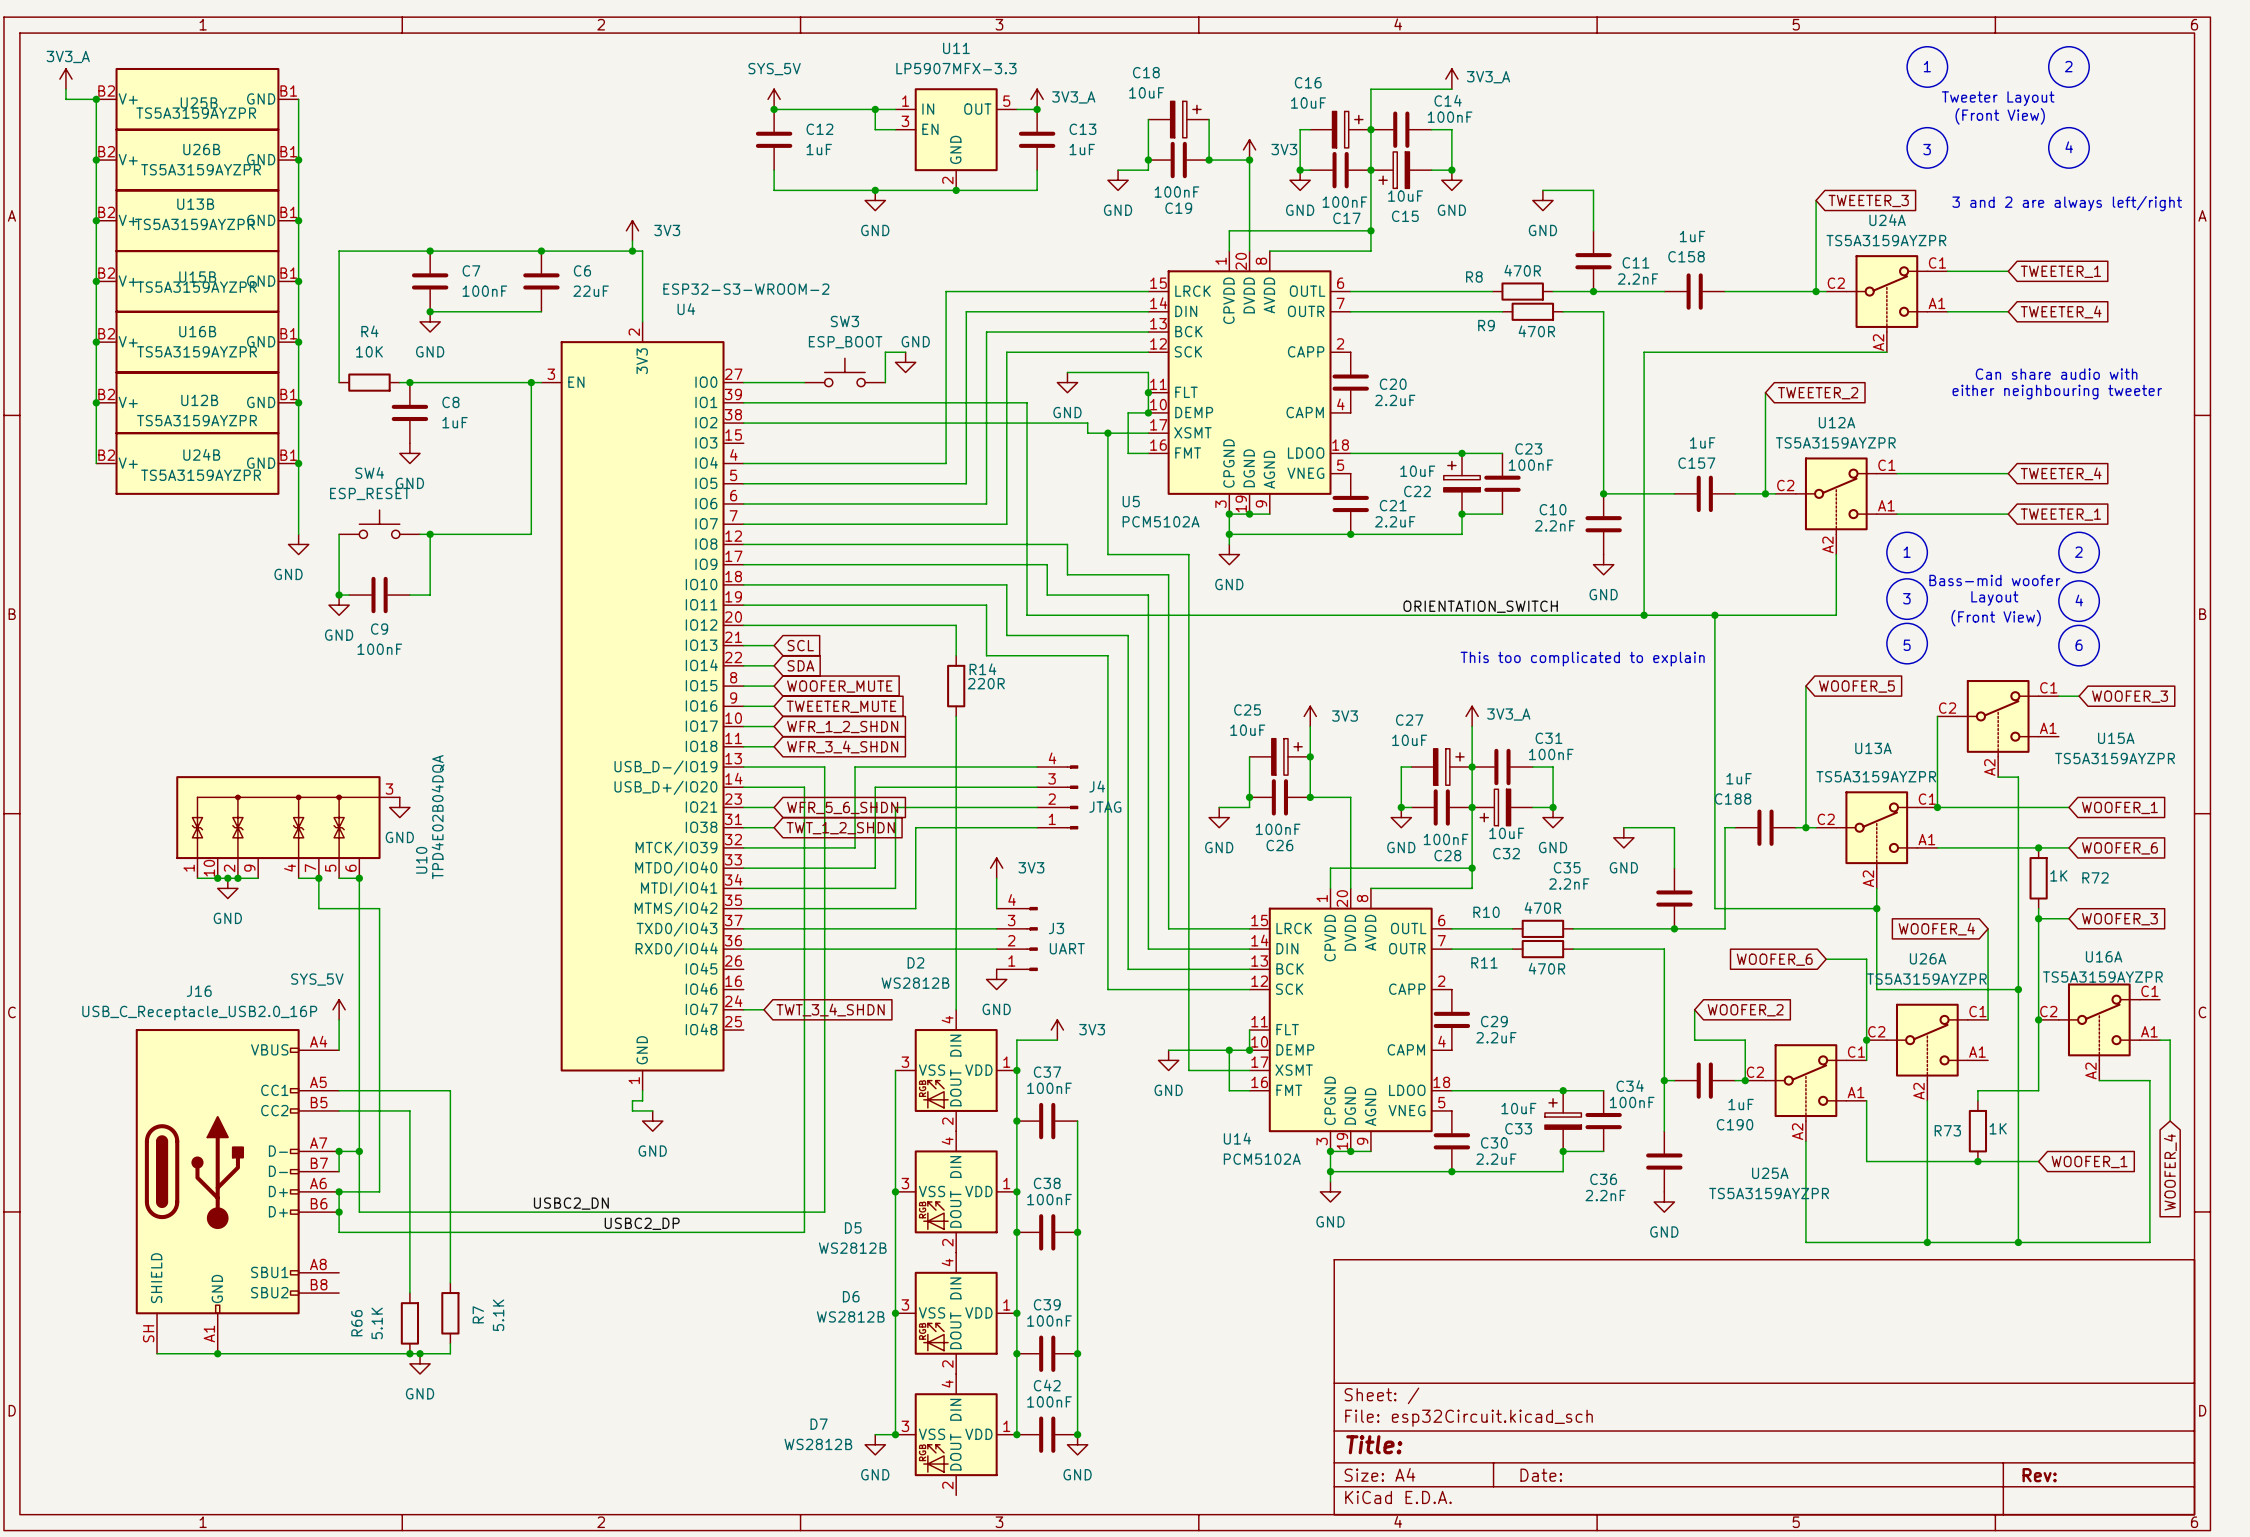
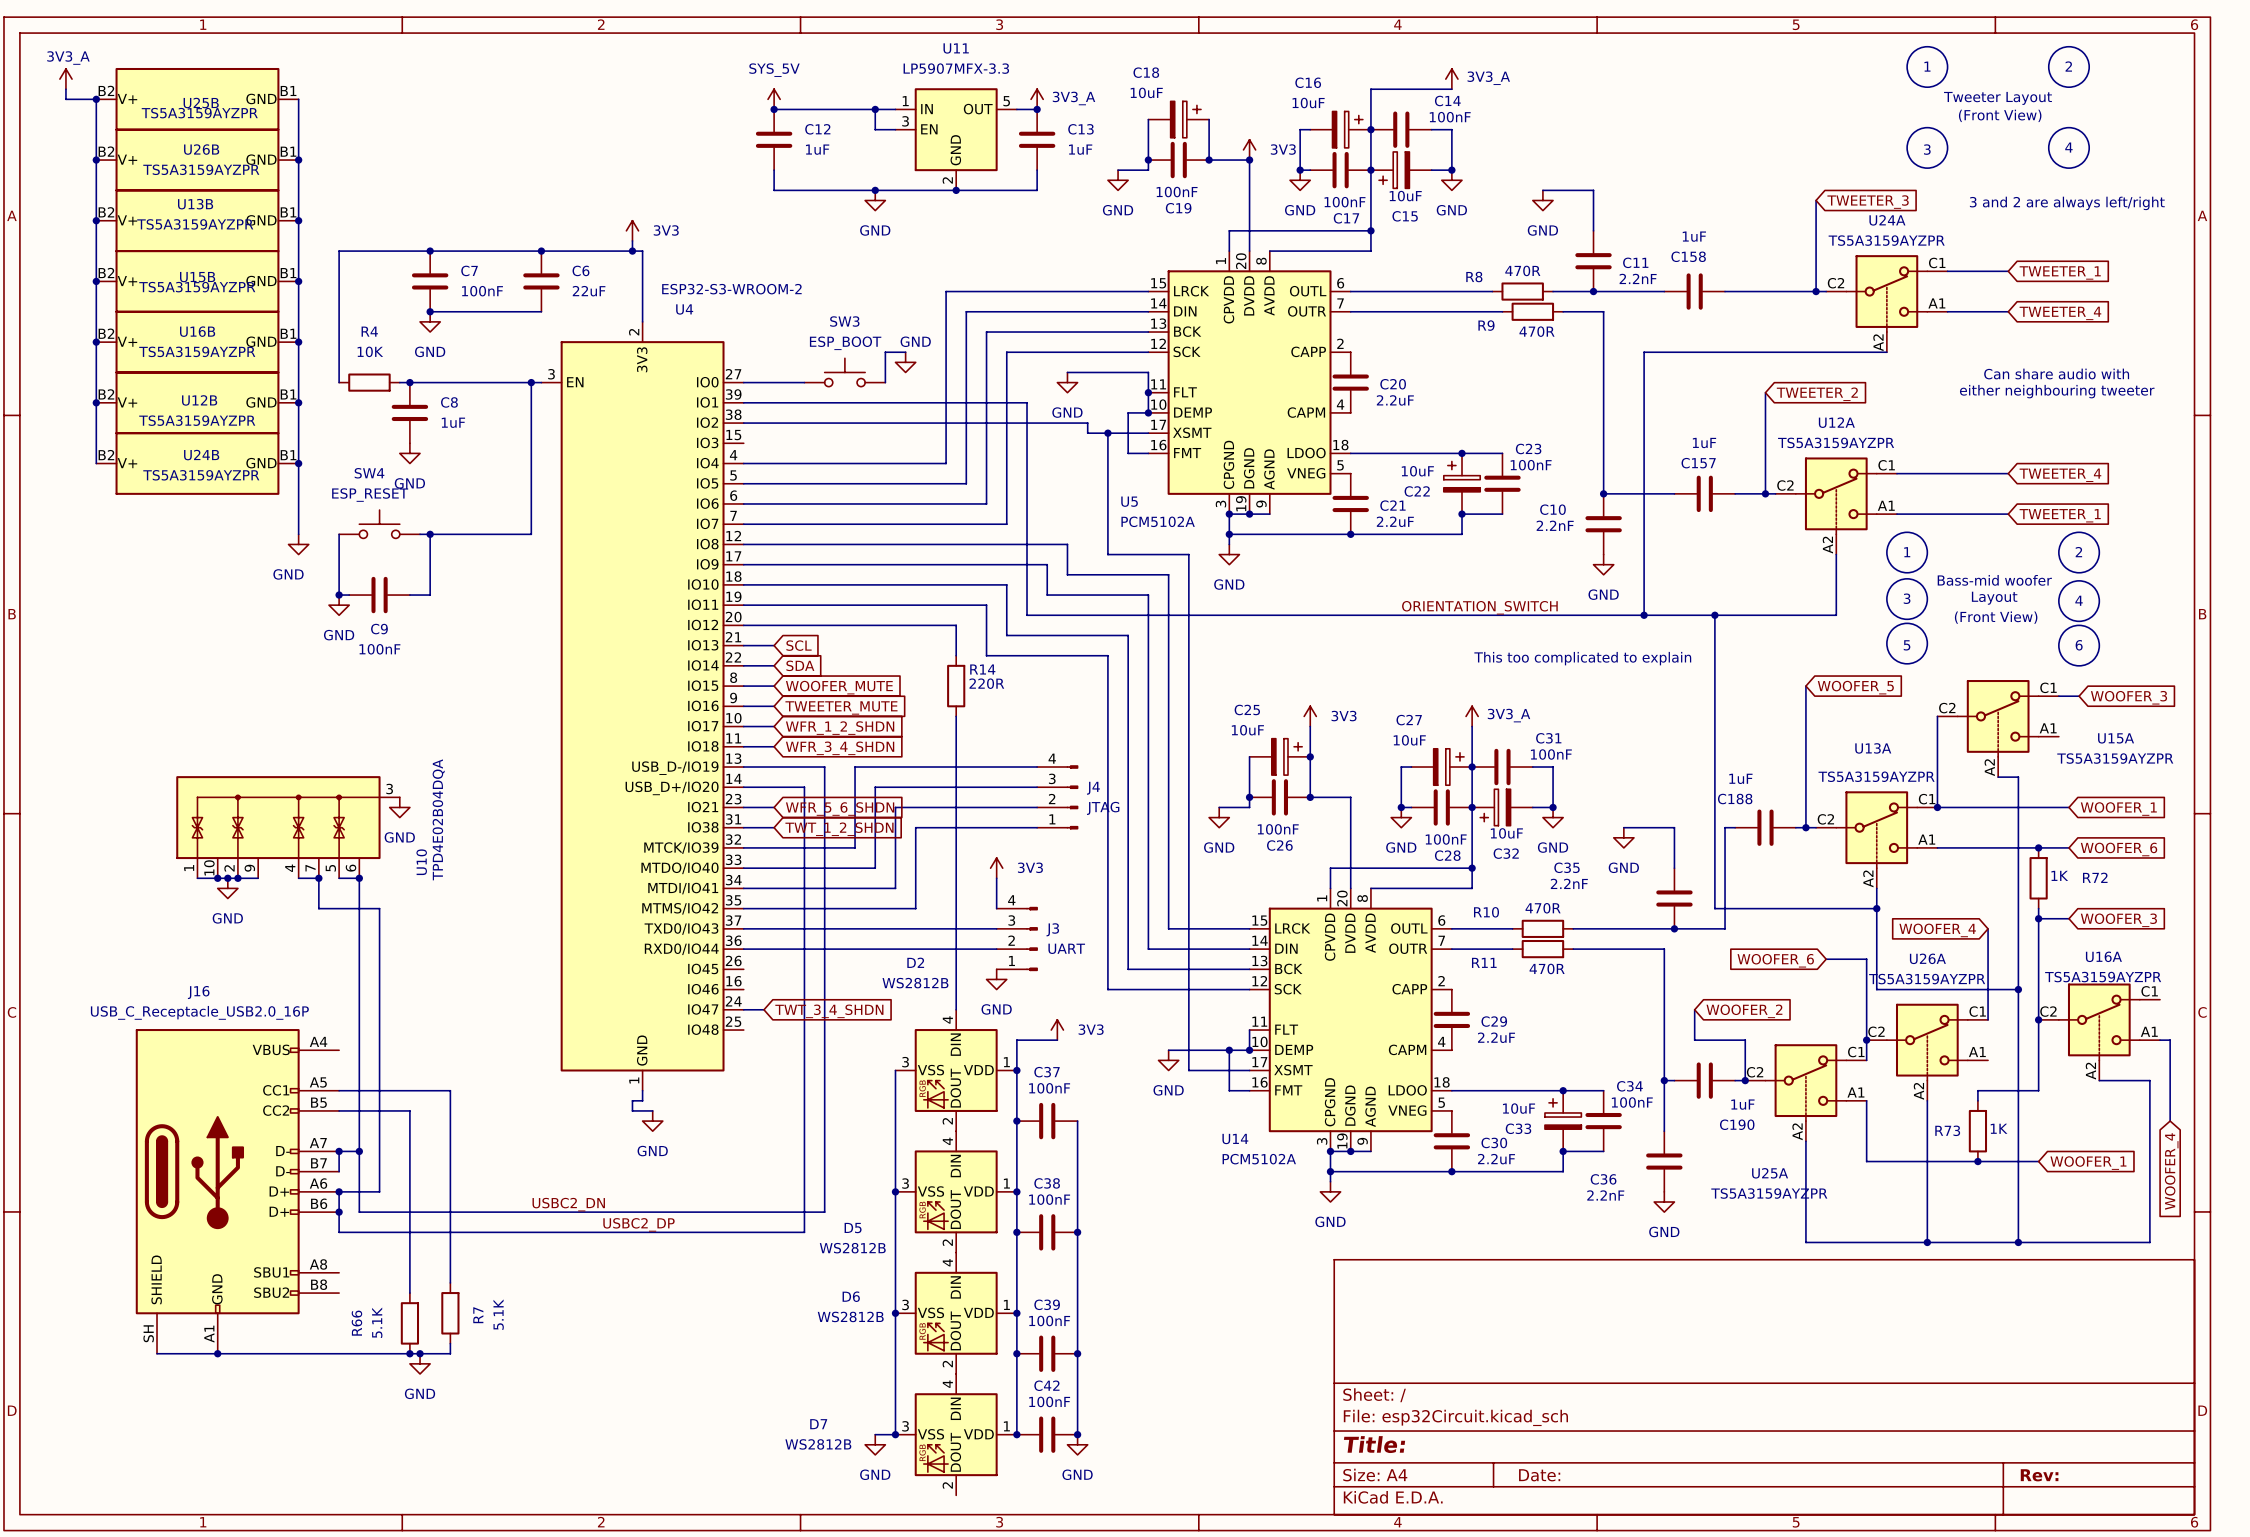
power symbol: SYS_5V (339, 1009) -> none
wire: (339, 1019) (339, 1050) -> none

